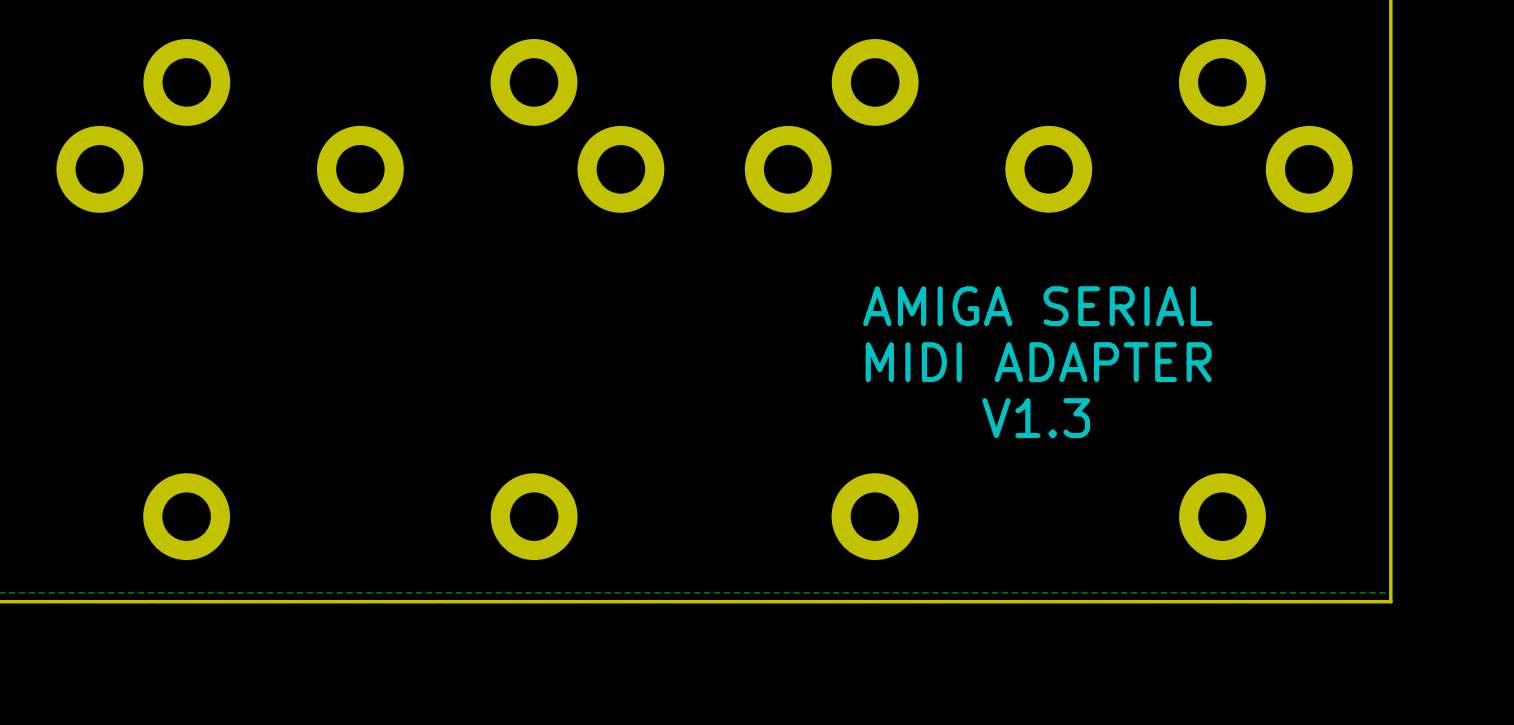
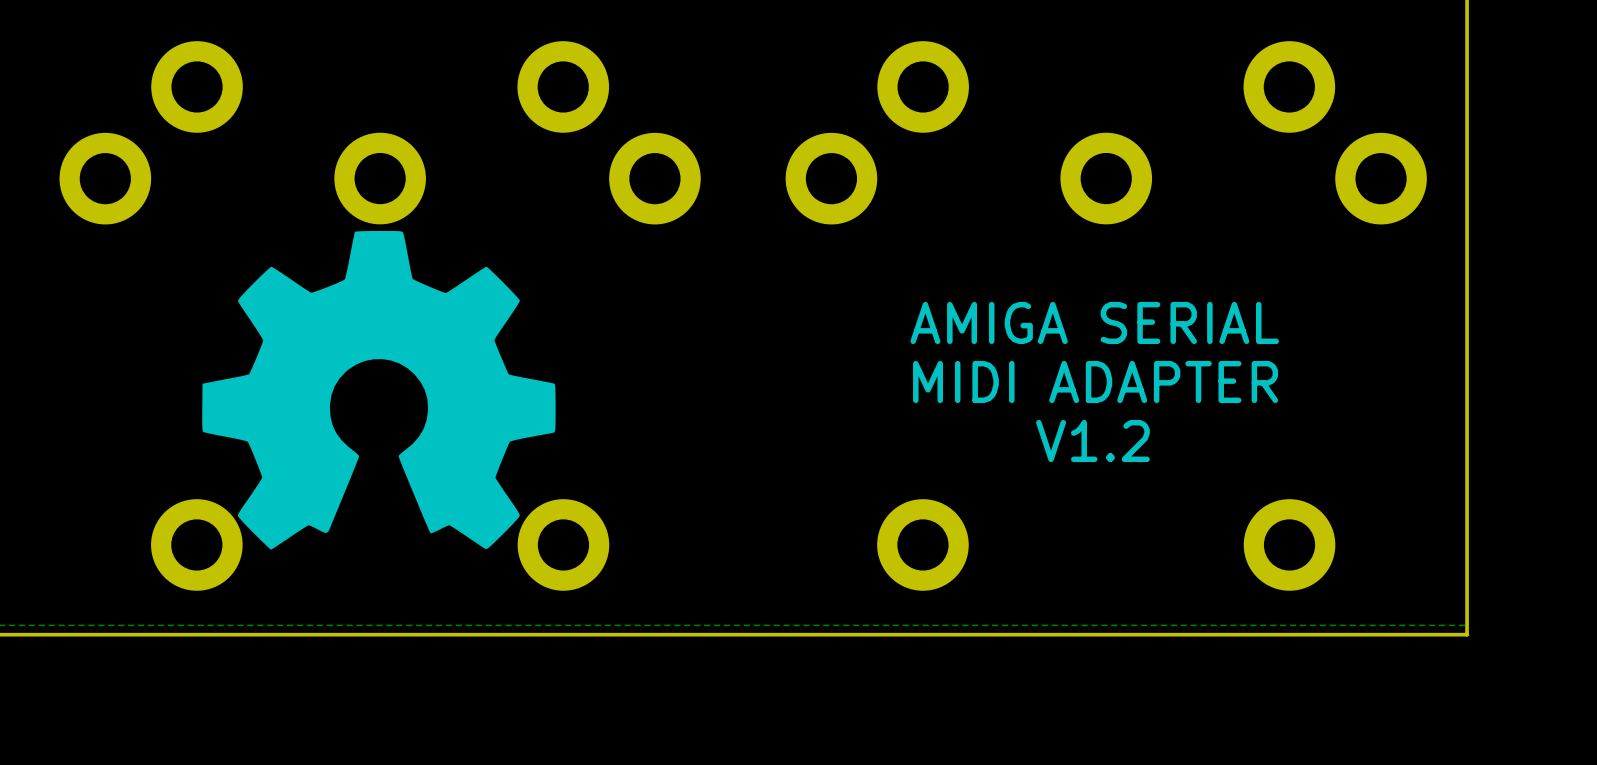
drawing: none -> [202, 230, 556, 550]
text: V1.3 (1036, 418) -> V1.2 (1092, 441)

